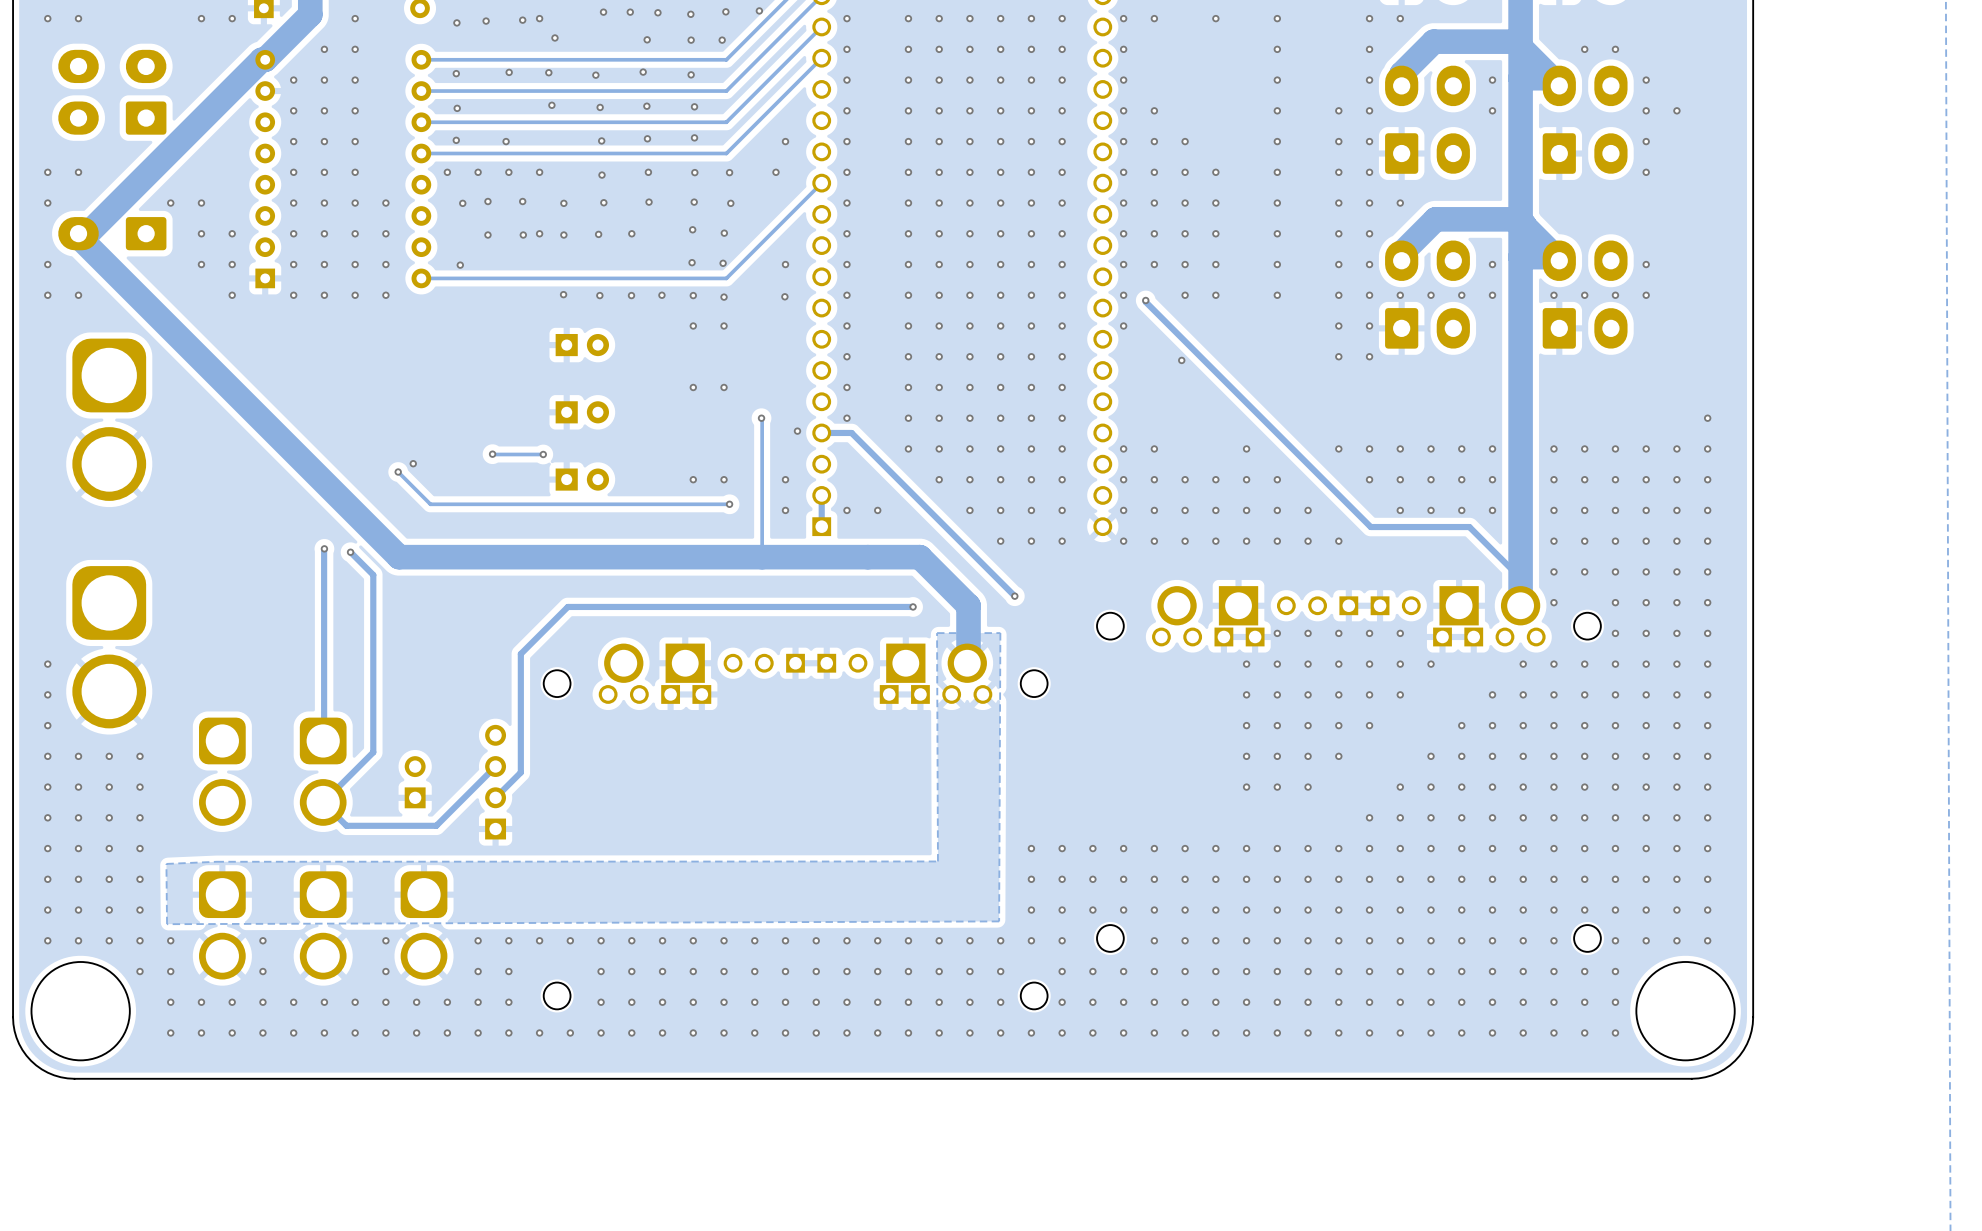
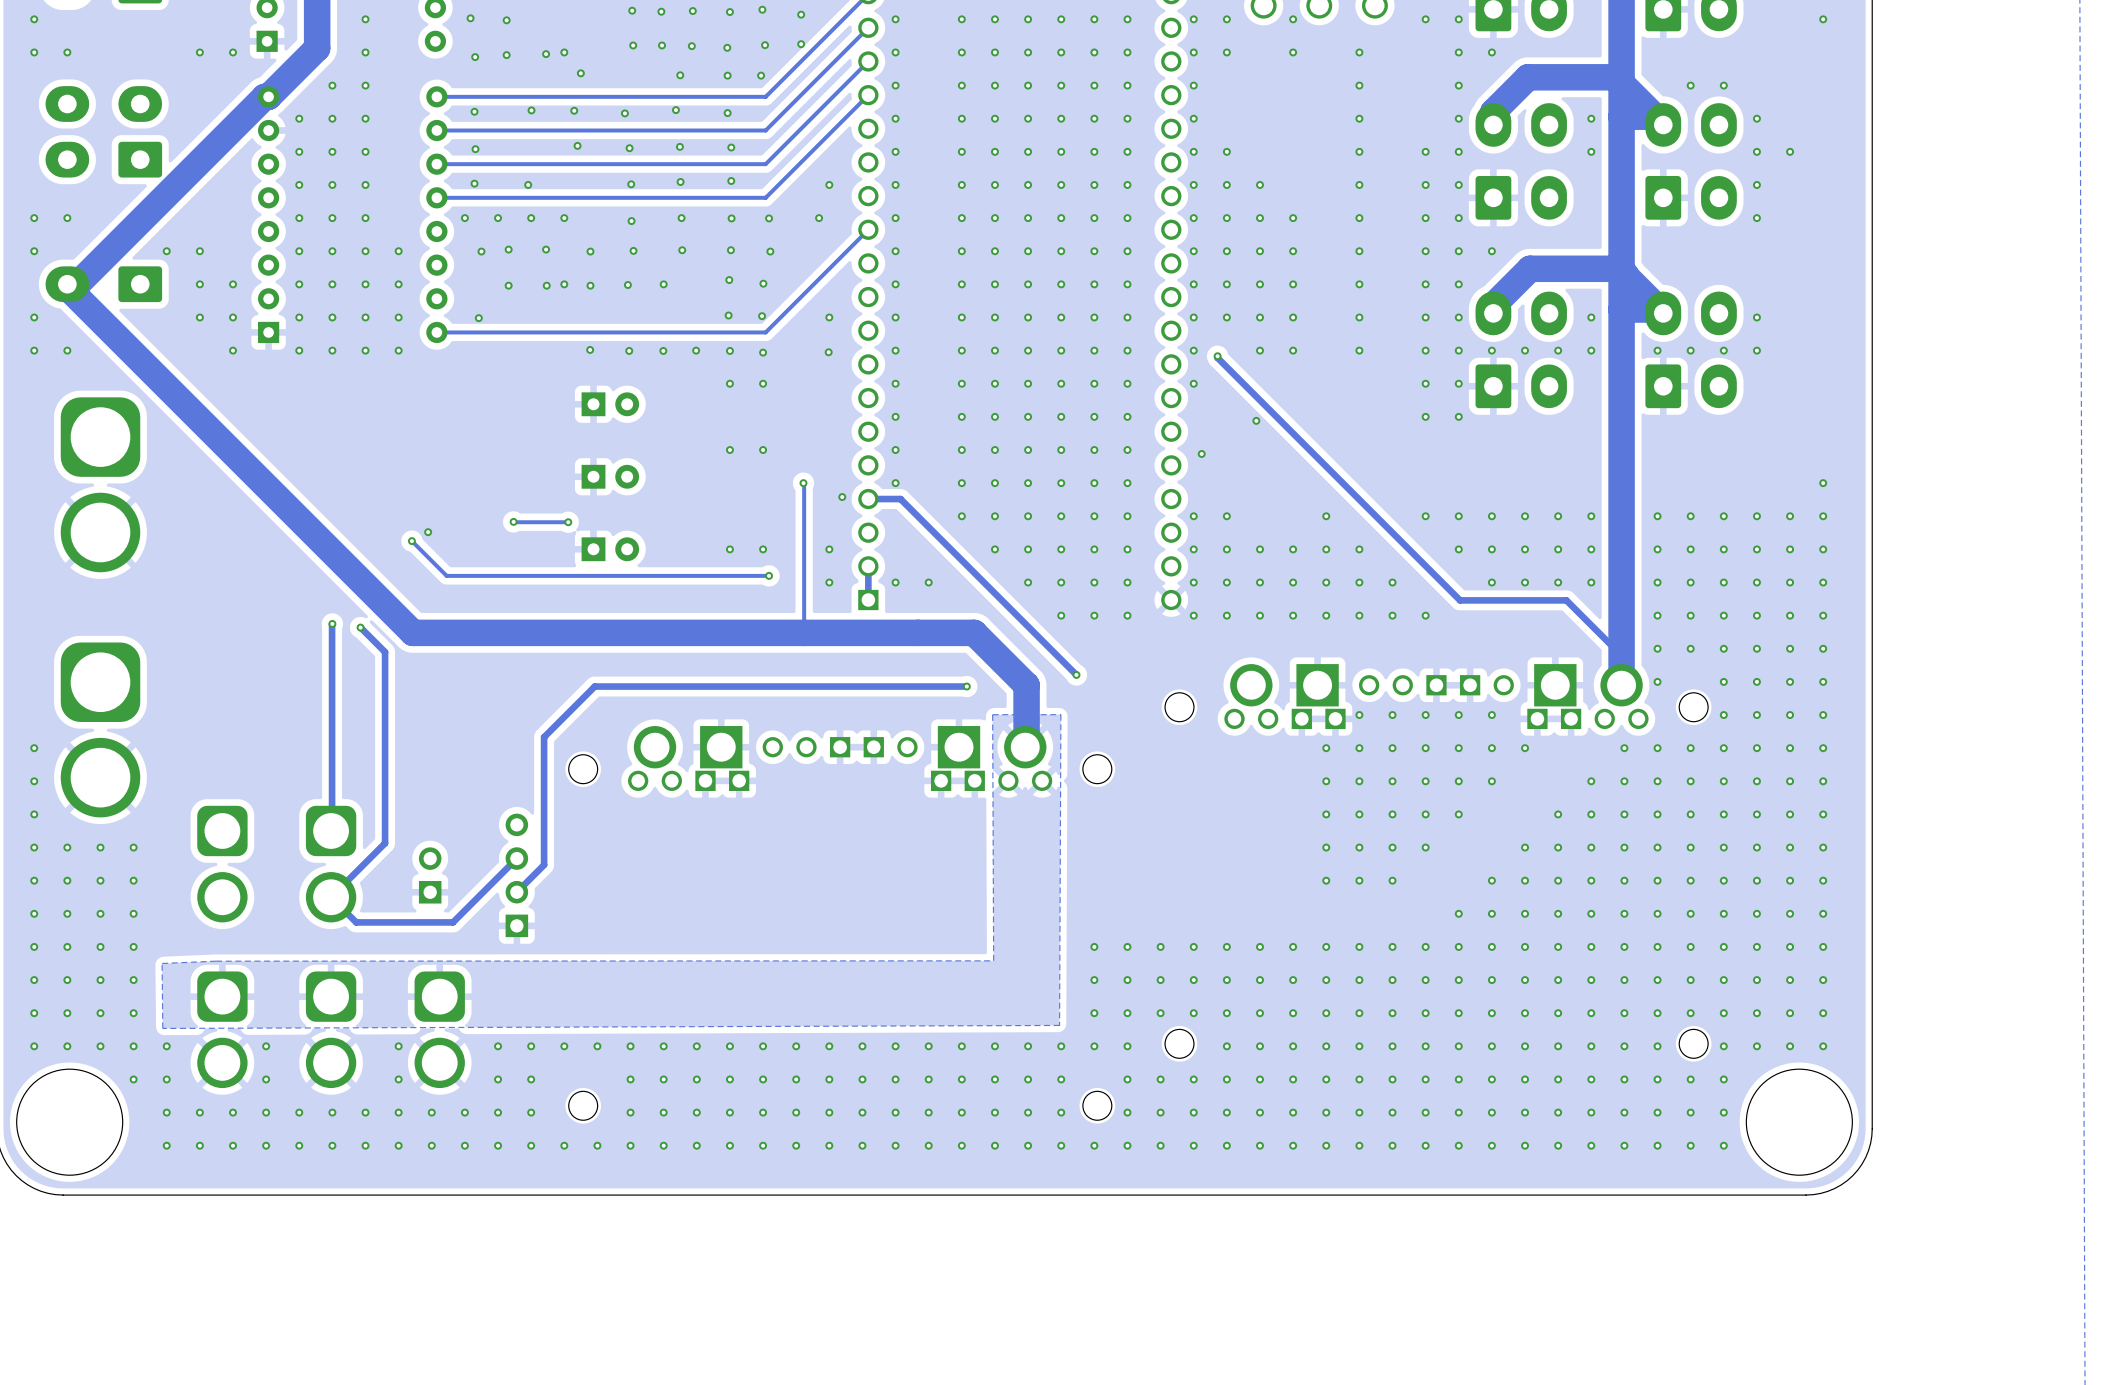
via: none -> (1201, 453)

